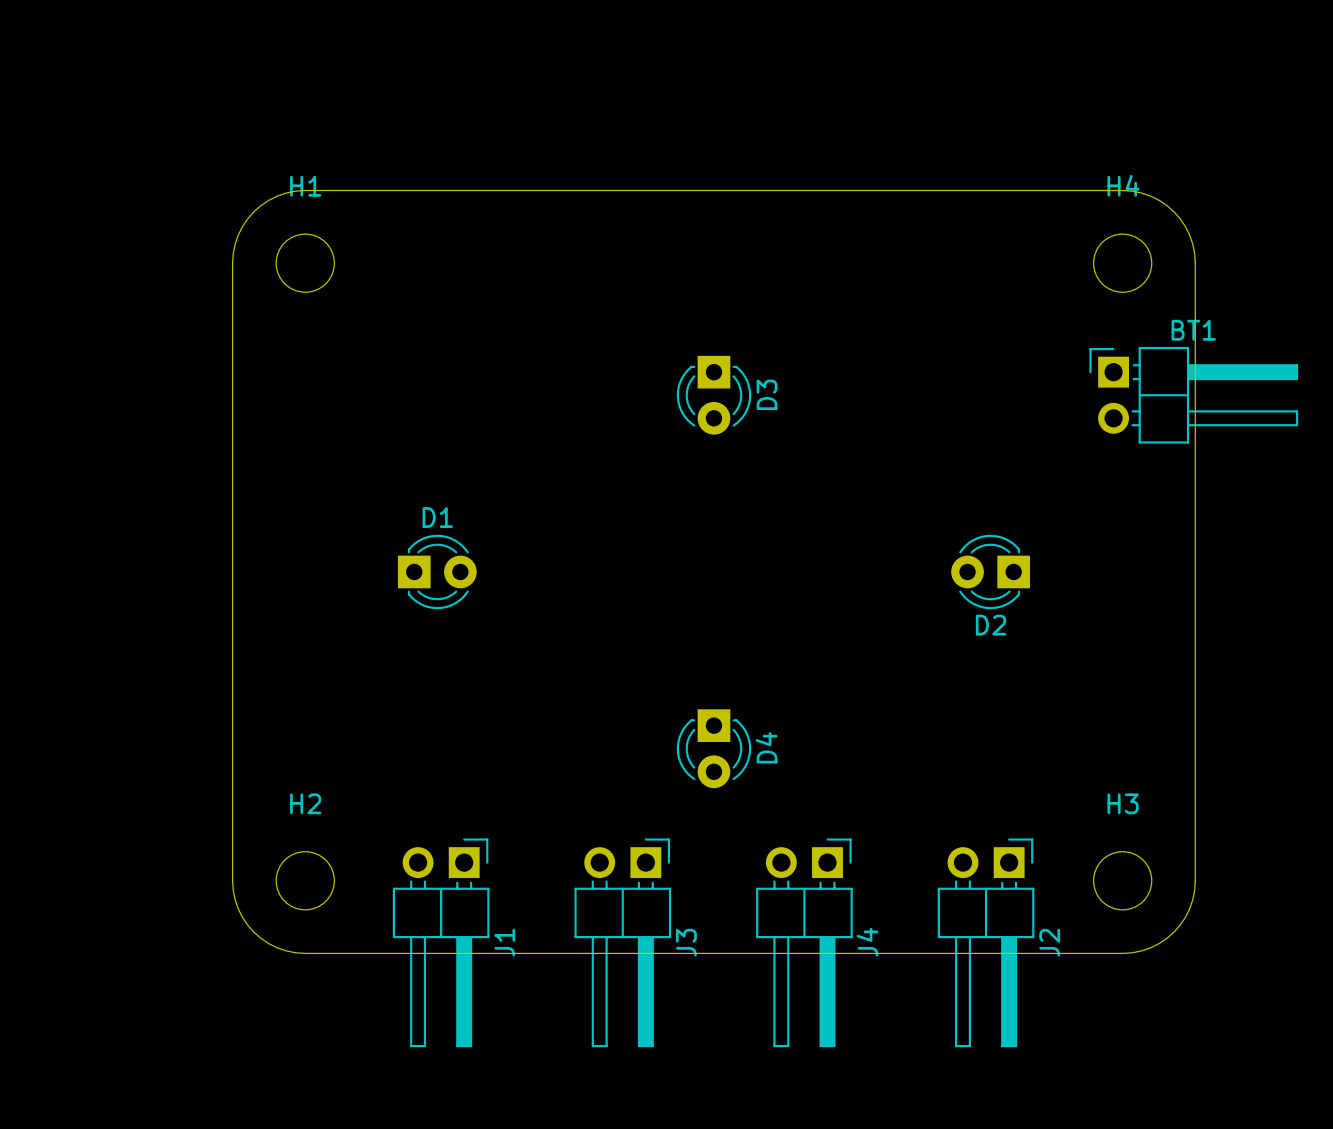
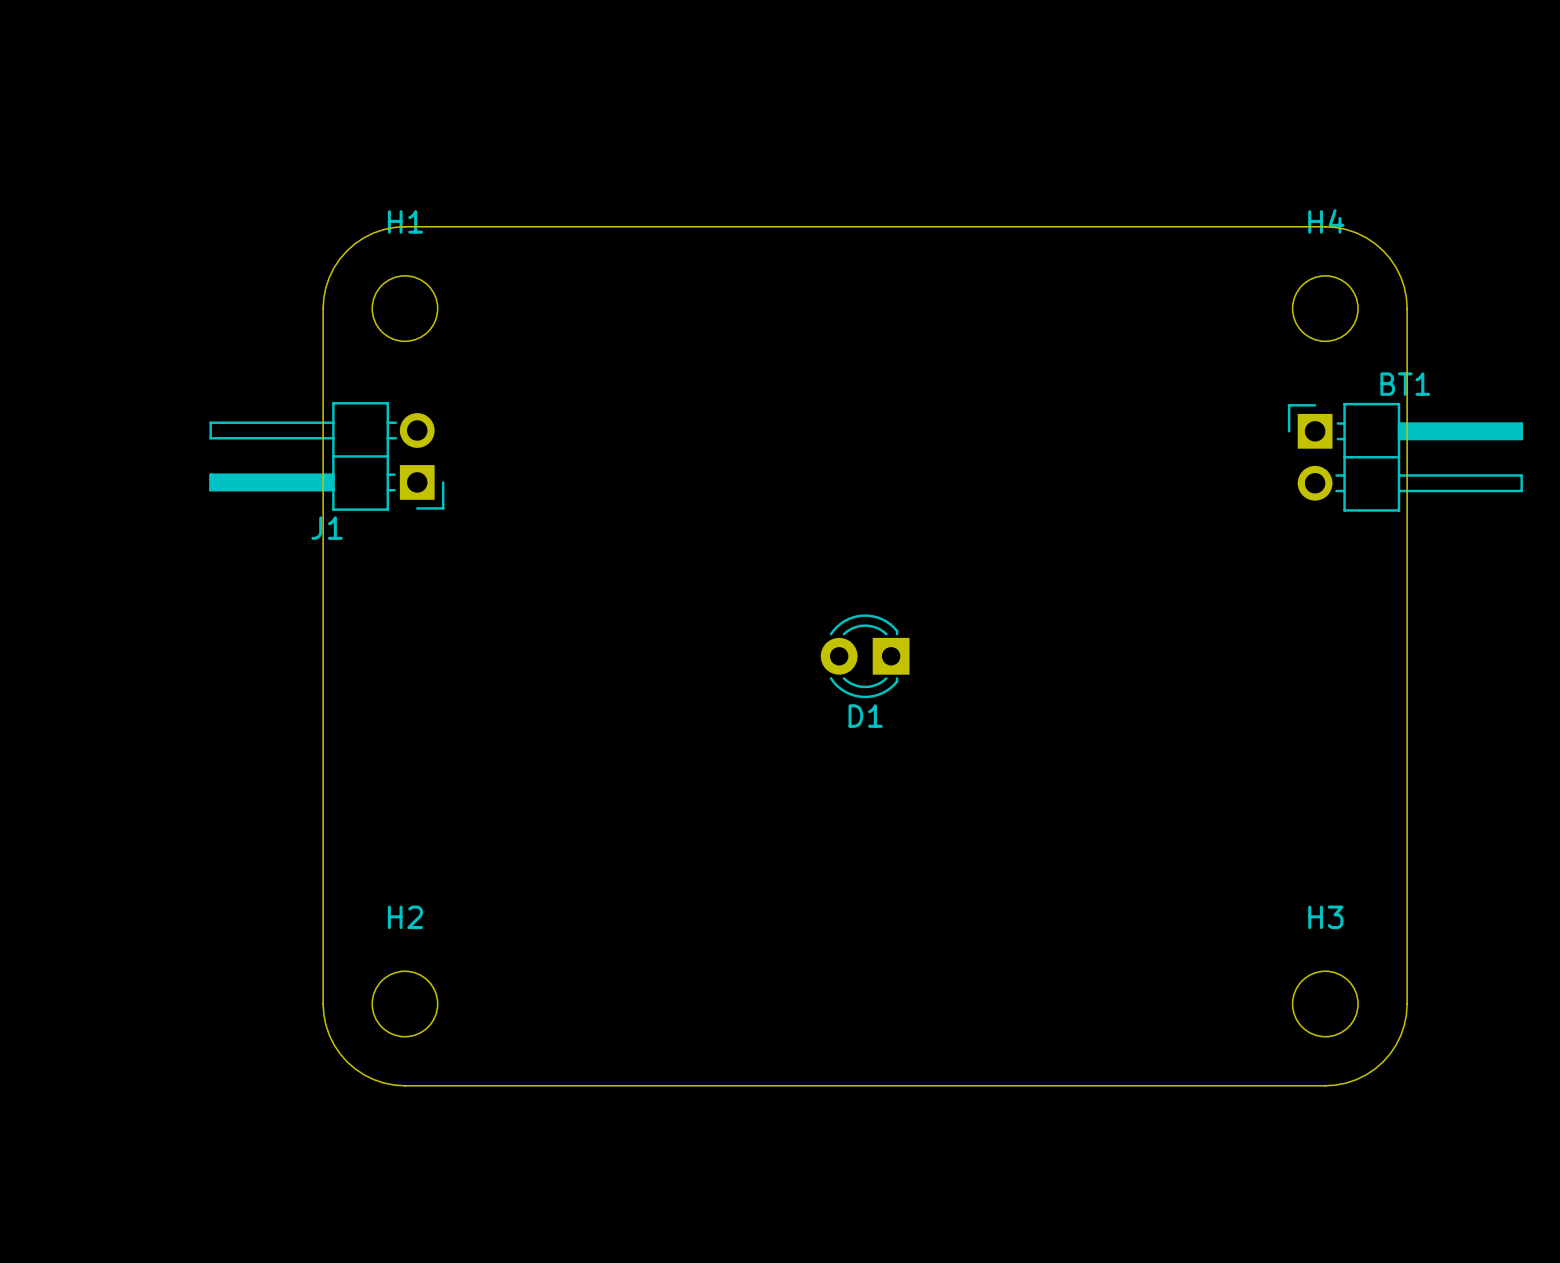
D3: (713, 395) -> none
D1 rotation: 0° (437, 571) -> 180° (865, 656)
D1 position: (437, 571) -> (865, 656)
D2: (990, 571) -> none
D4: (713, 748) -> none
J1 rotation: 0° (441, 942) -> 90° clockwise (326, 456)
J1 position: (441, 942) -> (326, 456)
J3: (622, 942) -> none
J4: (804, 942) -> none
J2: (986, 942) -> none

